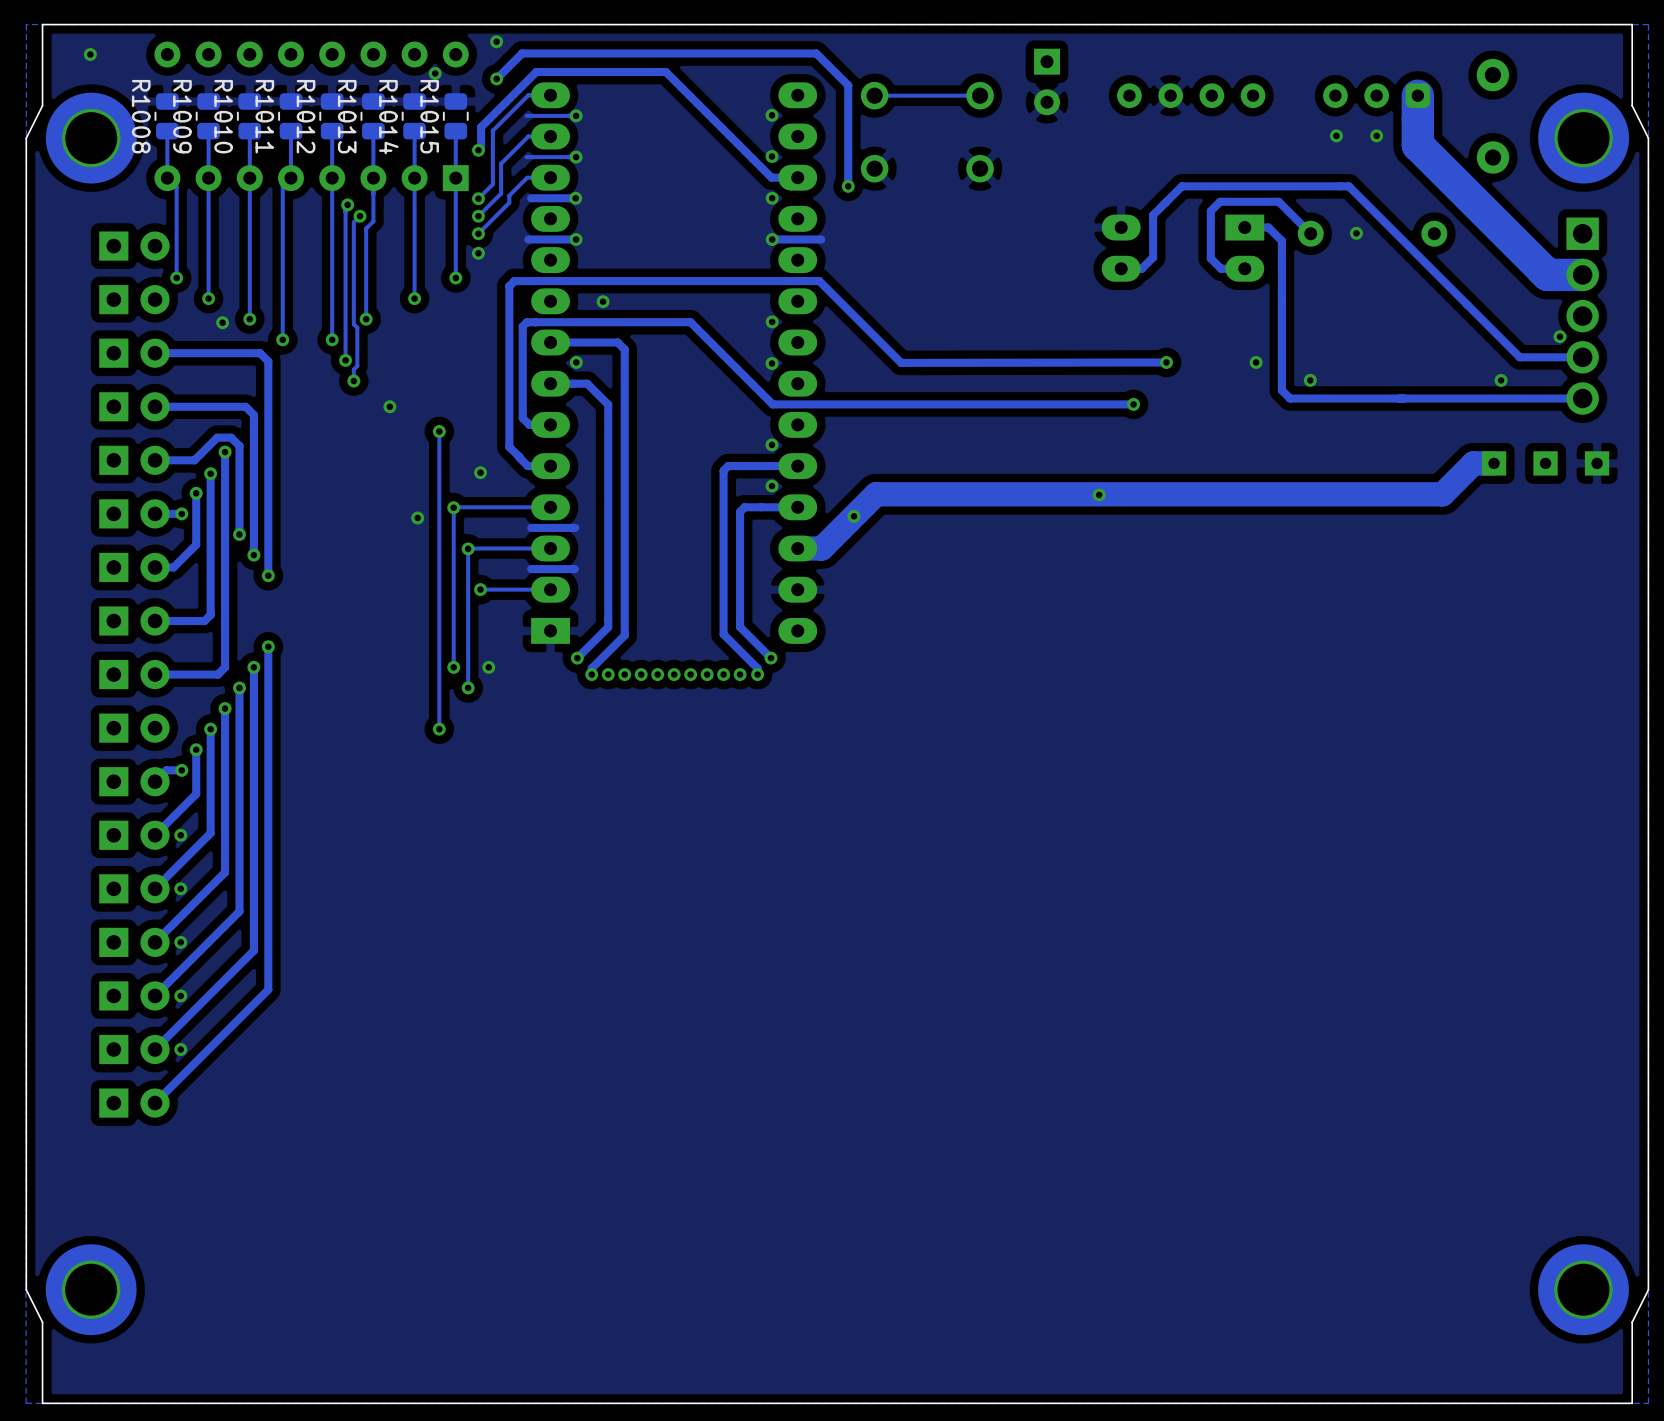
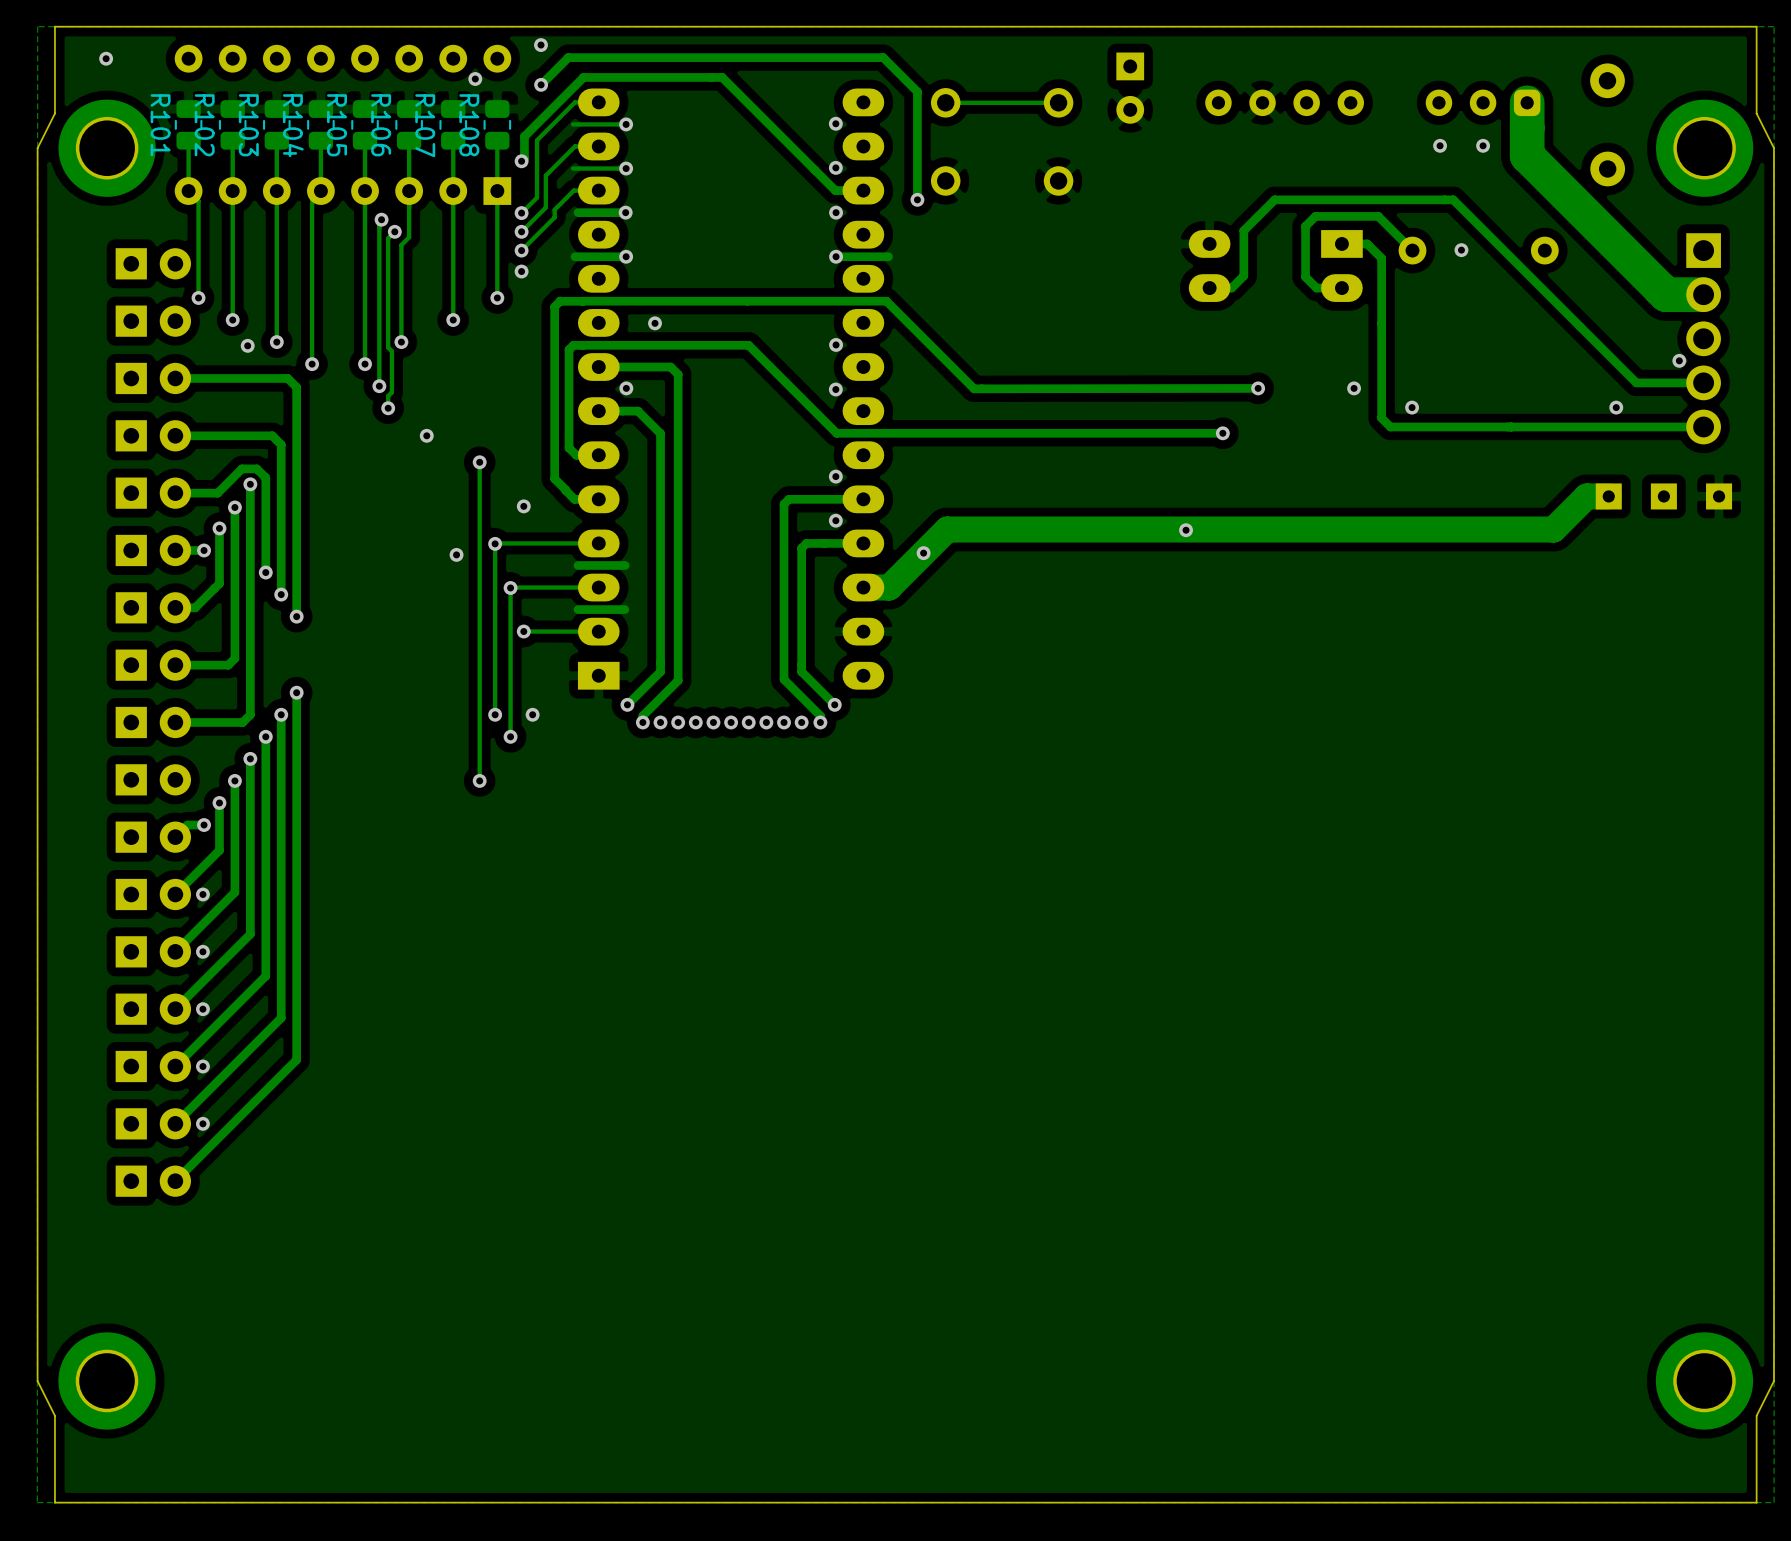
R1008 name: R1008 (141, 116) -> R101 (160, 125)
R1009 name: R1009 (182, 116) -> R102 (204, 125)
R1010 name: R1010 (223, 116) -> R103 (248, 125)
R1011 name: R1011 (264, 116) -> R104 (293, 125)
R1012 name: R1012 (306, 116) -> R105 (337, 125)
R1013 name: R1013 (347, 116) -> R106 (381, 125)
R1015 name: R1015 (429, 116) -> R108 (469, 125)
R1014 name: R1014 (388, 117) -> R107 (425, 125)

